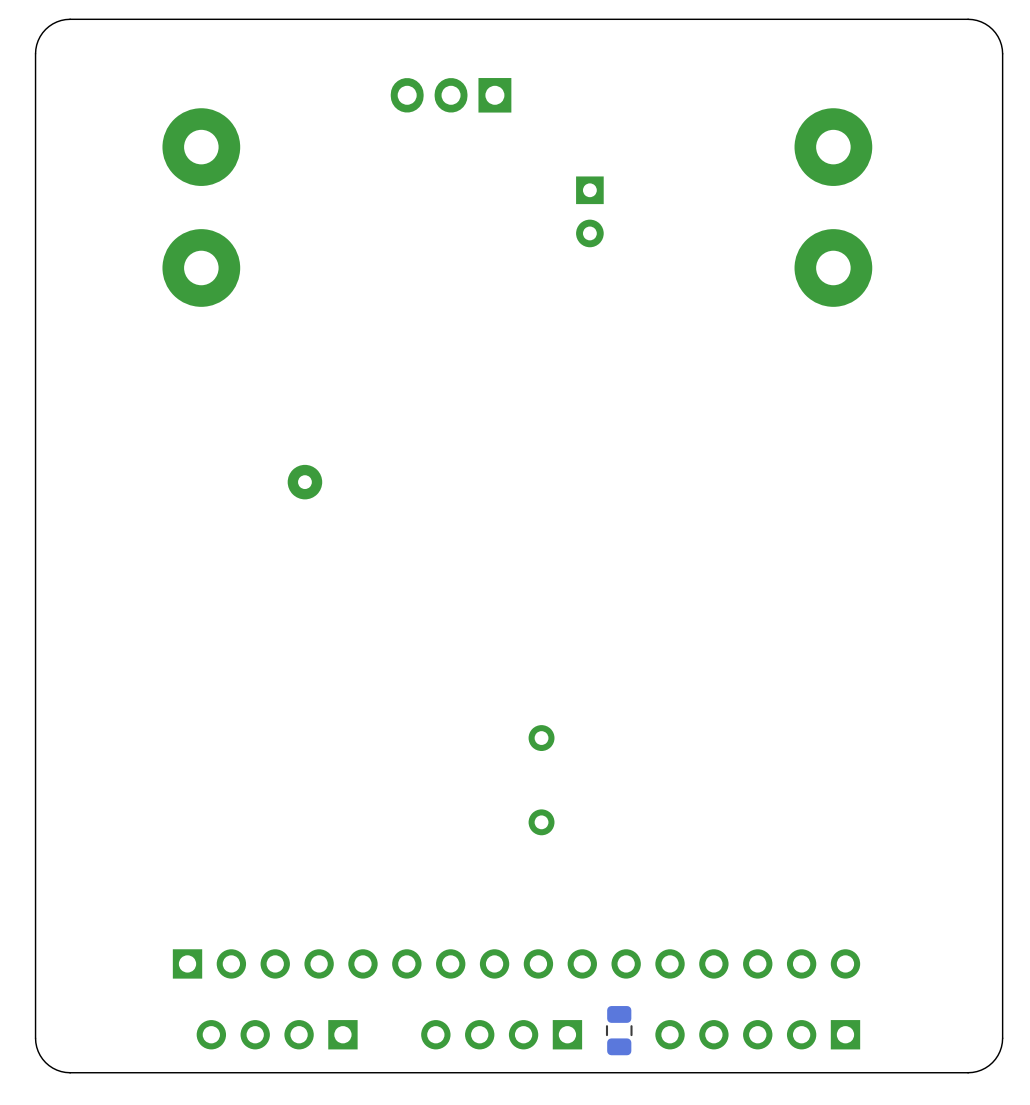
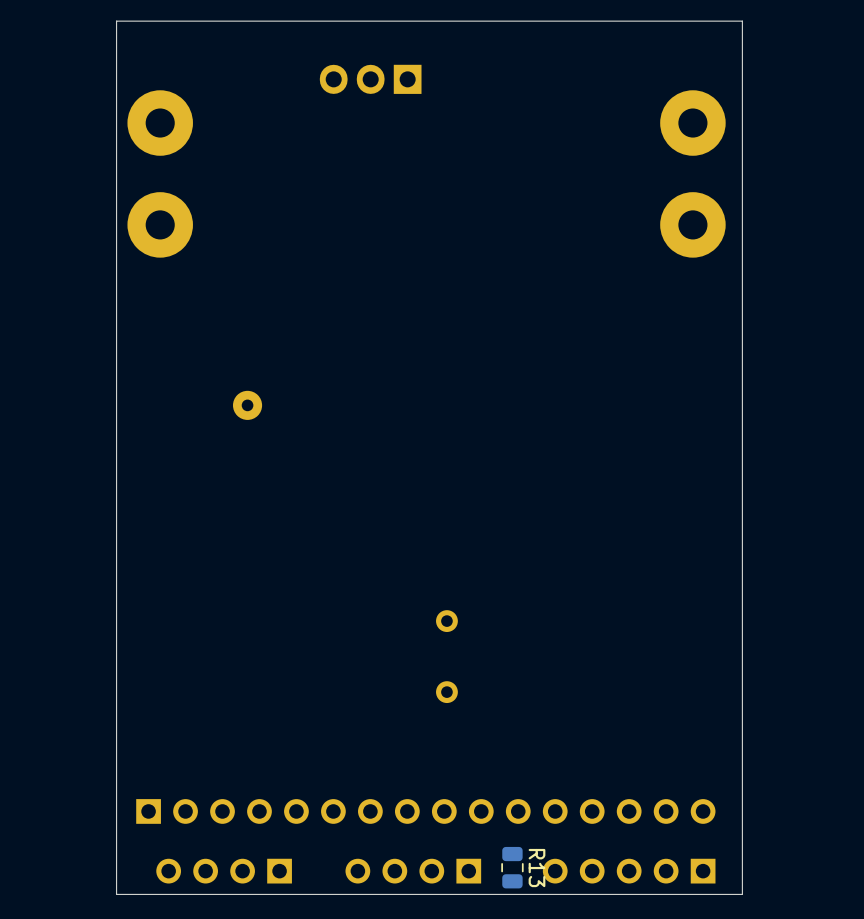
board edge: (968, 19) (70, 19) (56, 21) (45, 29) (38, 40) (35, 53) (35, 1038) (38, 1051) (45, 1062) (56, 1070) (70, 1072) (968, 1072) (981, 1070) (992, 1062) (1000, 1051) (1002, 1038) (1002, 53) (1000, 40) (992, 29) (981, 21) (968, 19) -> (742, 21) (742, 894) (116, 894) (116, 21) (742, 21)
part: (589, 211) -> none
R13 name: none -> R13 (537, 868)

